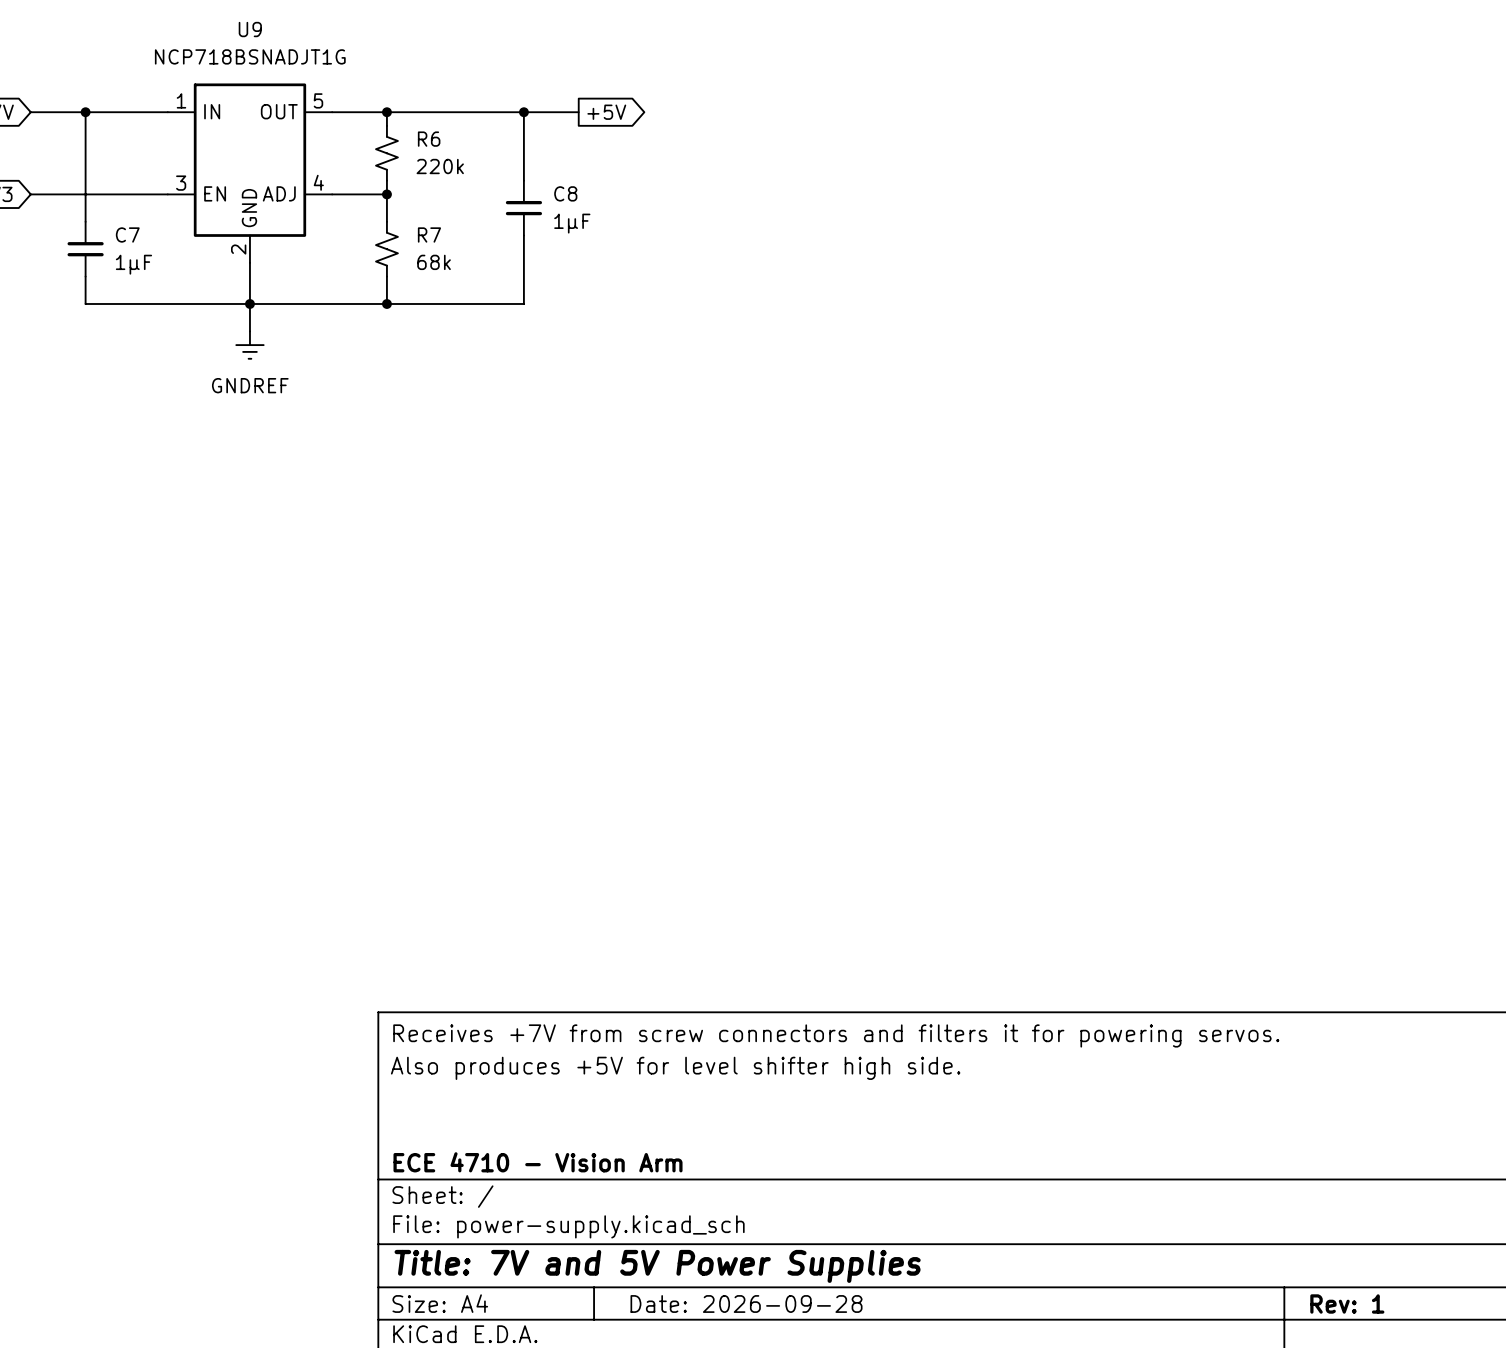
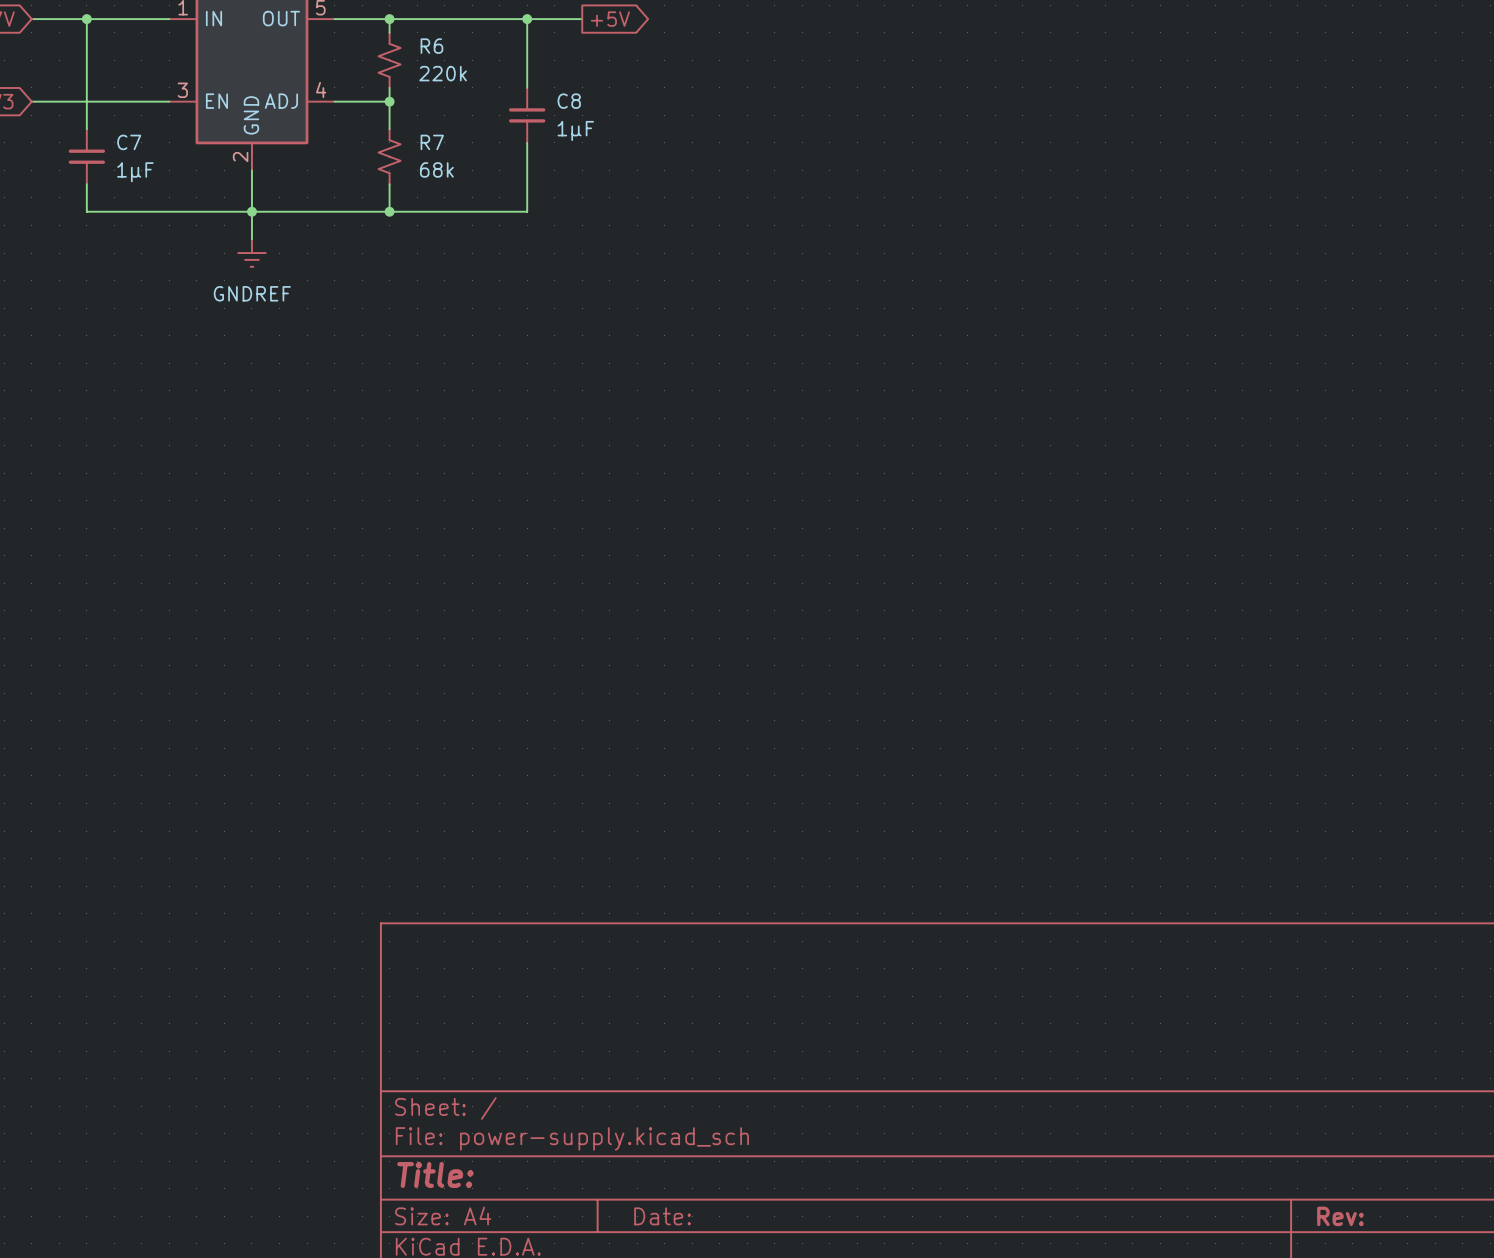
title block: Receives +7V from screw connectors and filters it for powering servos. (836, 1035) -> none
title block: Also produces +5V for level shifter high side. (675, 1068) -> none
title block: ECE 4710 - Vision Arm (538, 1162) -> none
title block: Title: 7V and 5V Power Supplies (657, 1266) -> Title: (435, 1174)
title block: Date: 2026-09-28 (746, 1304) -> Date: (662, 1216)
title block: Rev: 1 (1347, 1304) -> Rev: (1340, 1216)

